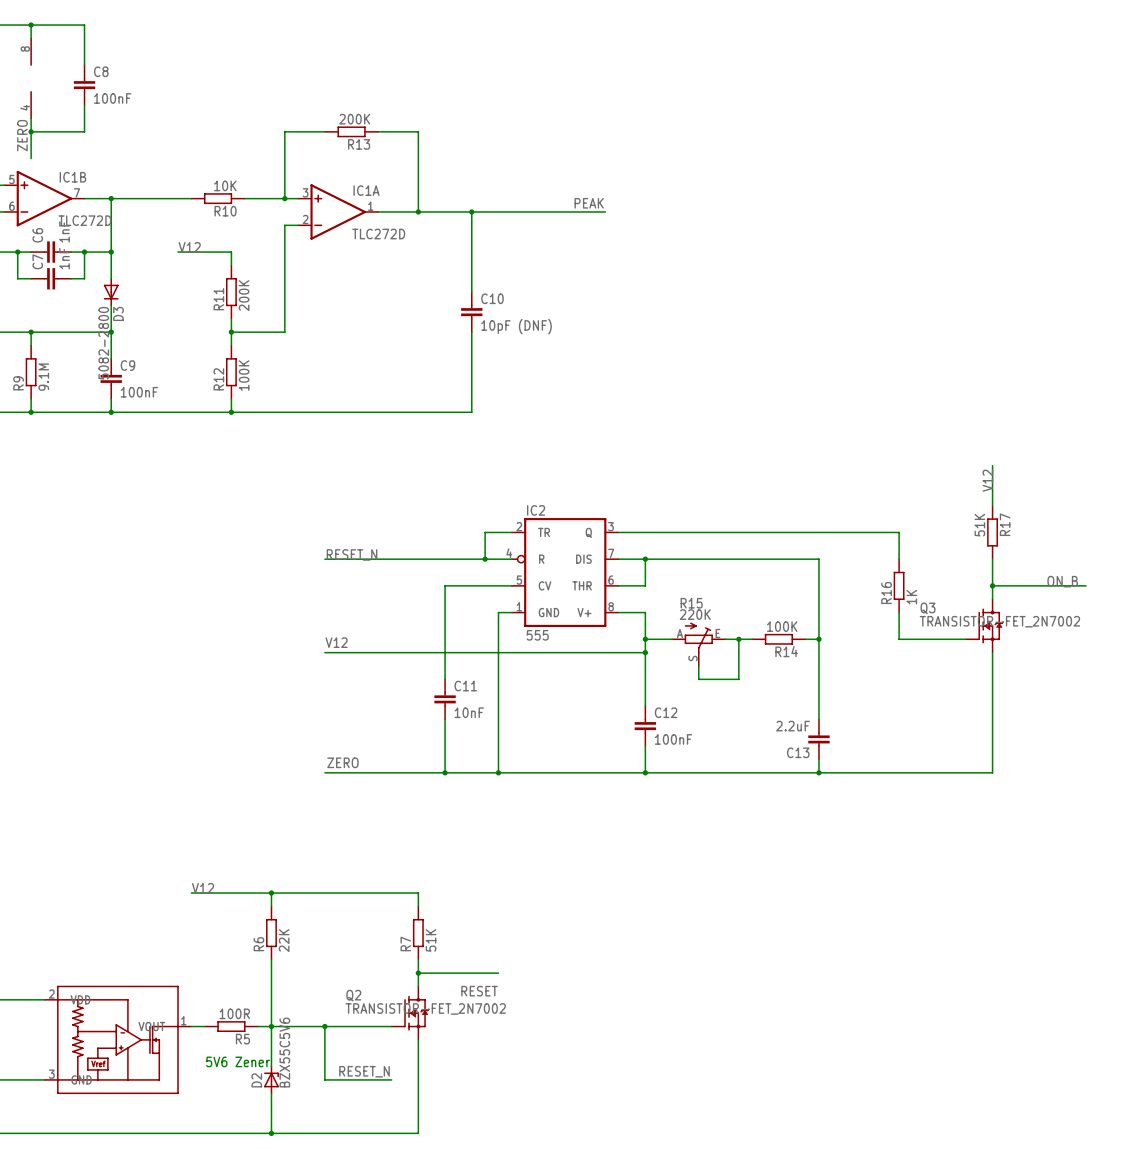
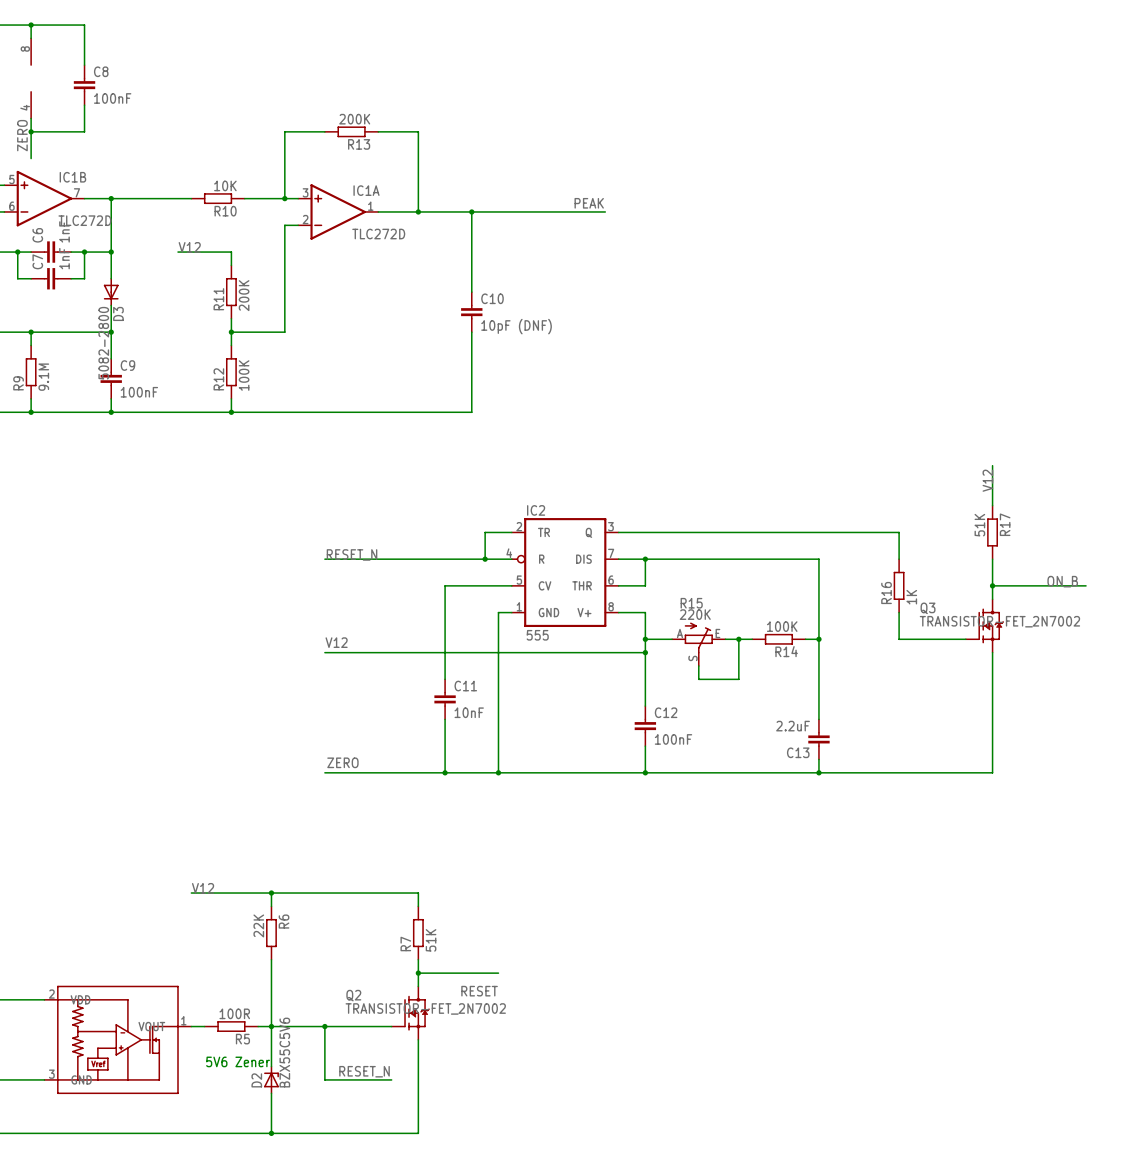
R6 value position: 22K (284, 940) -> 22K (258, 925)
R6 name position: R6 (258, 944) -> R6 (284, 921)

